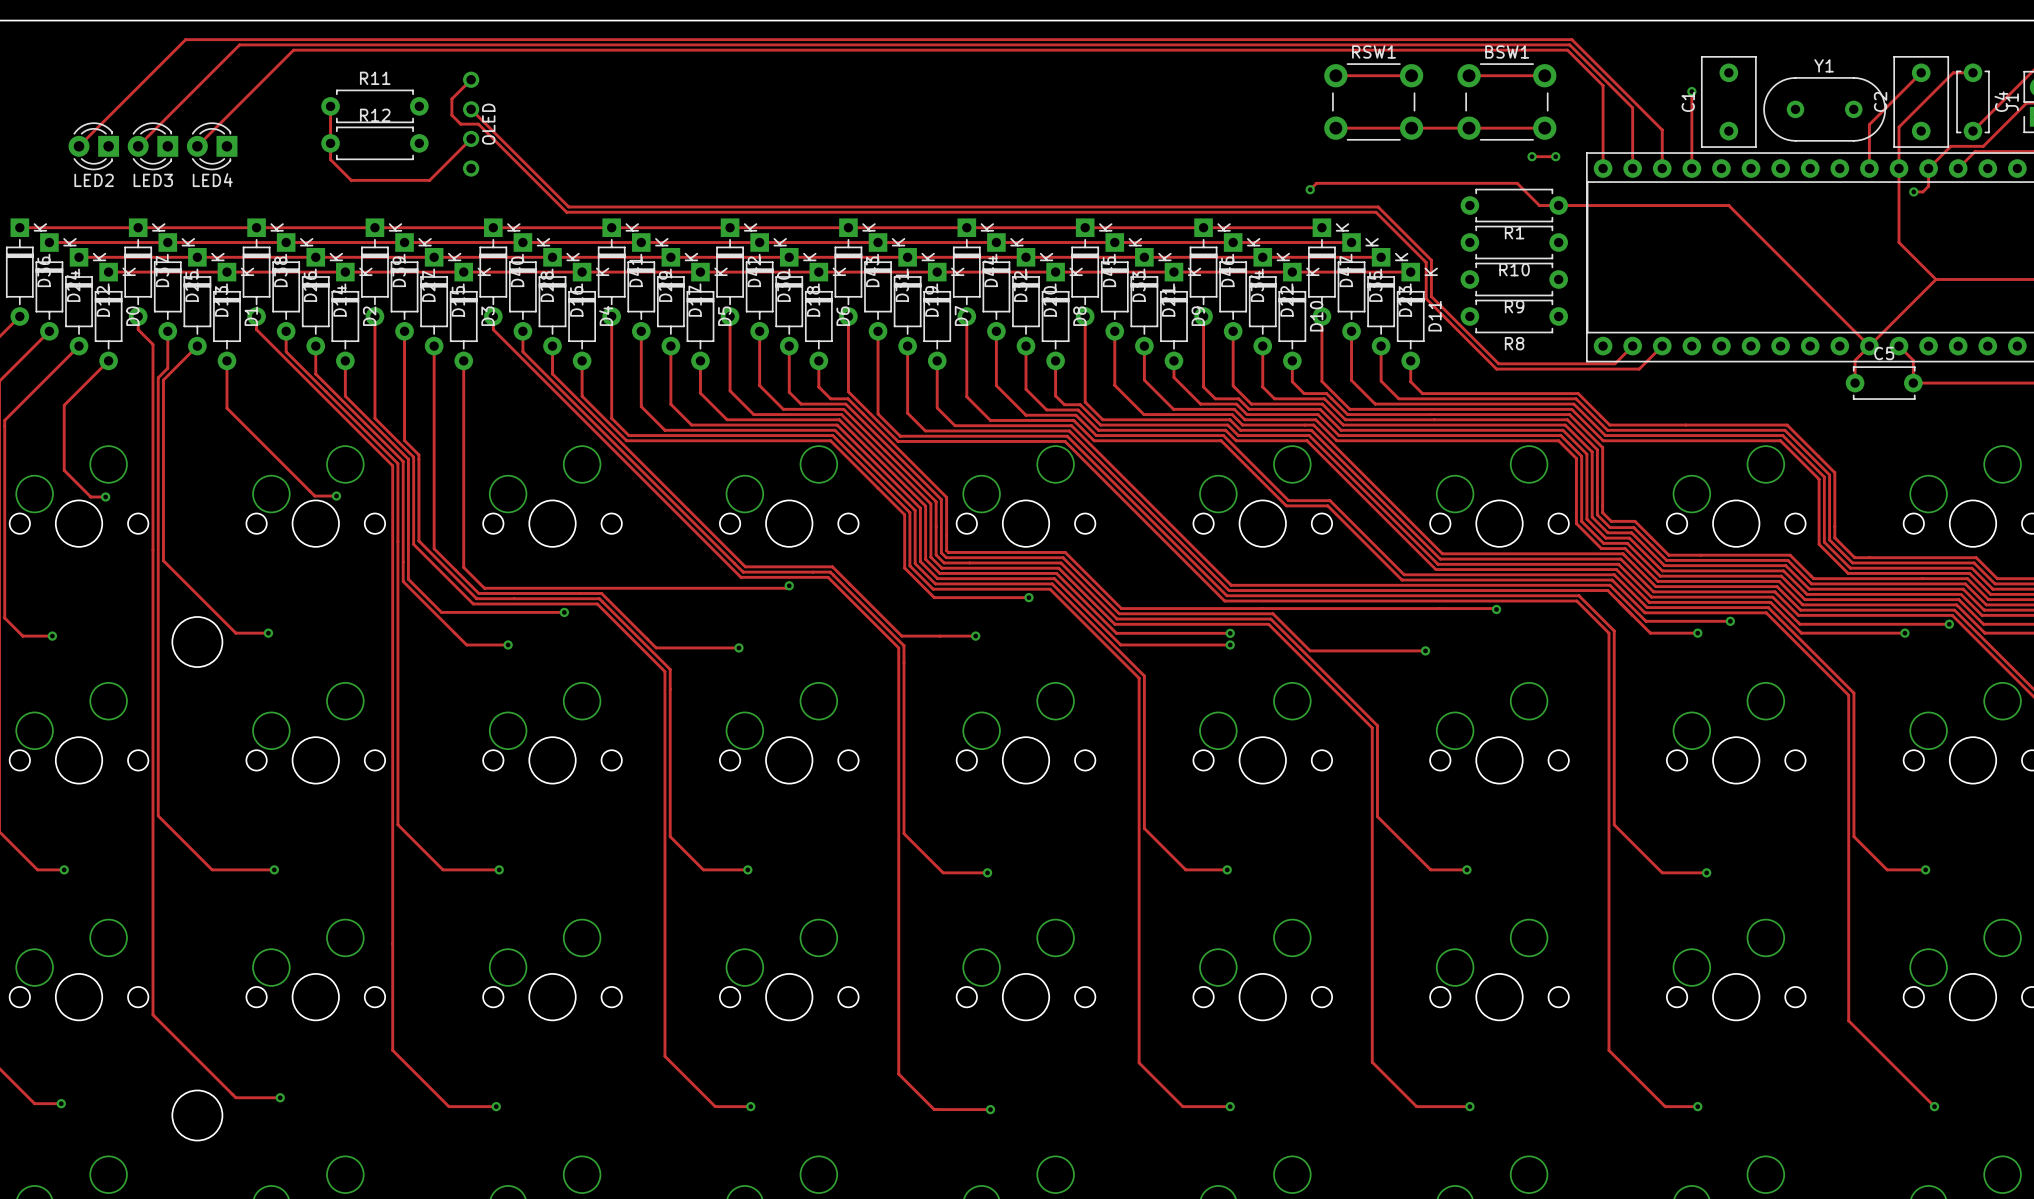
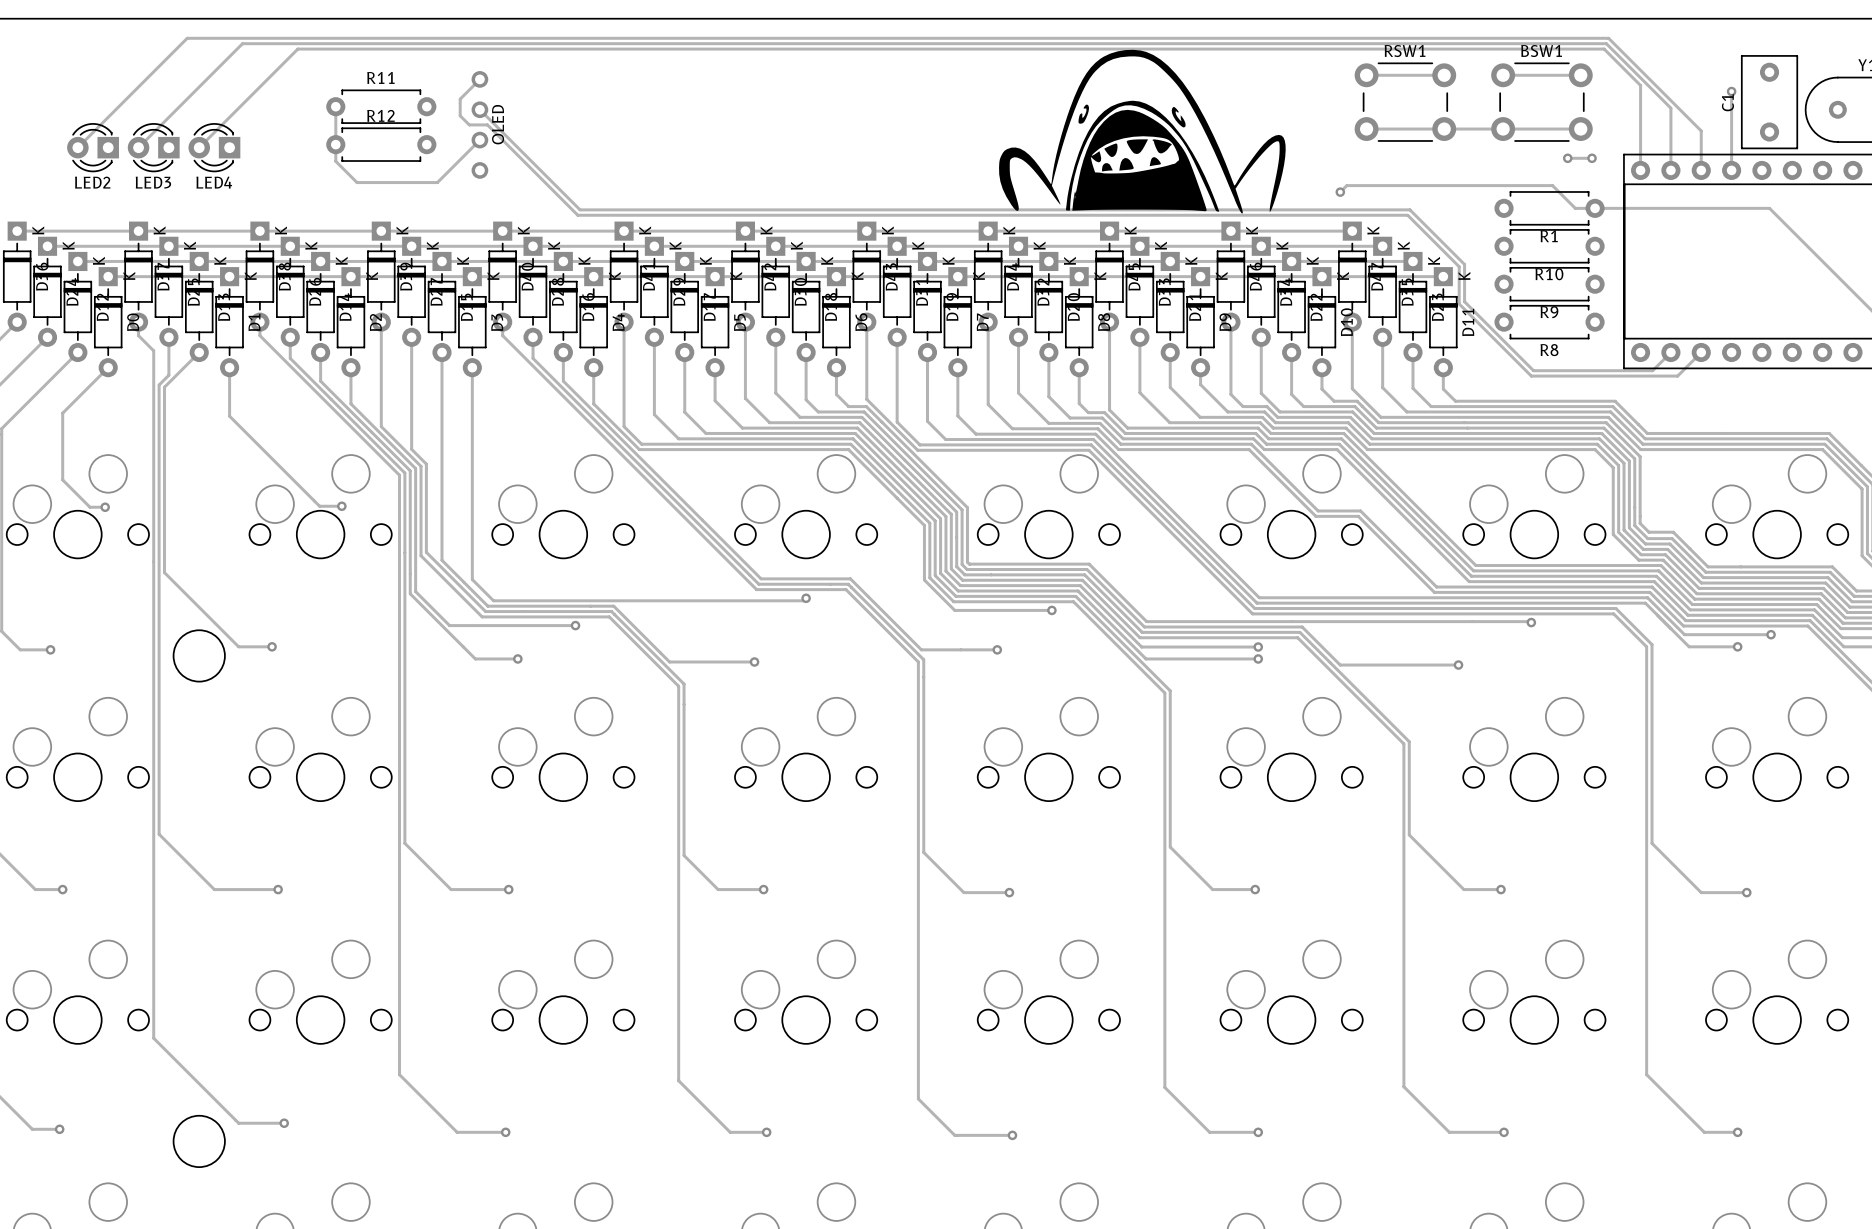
drawing: none -> [999, 49, 1286, 214]

